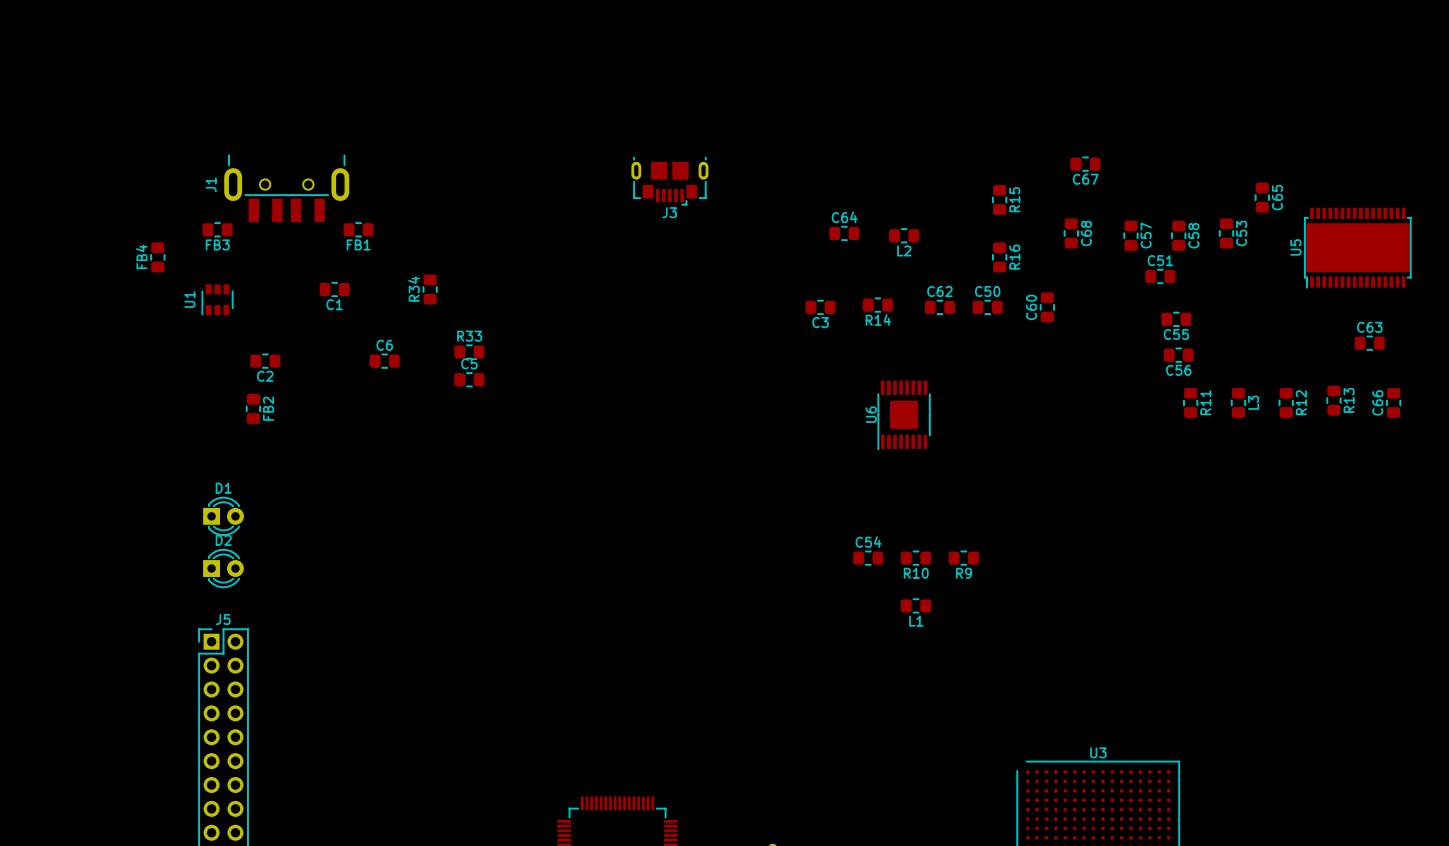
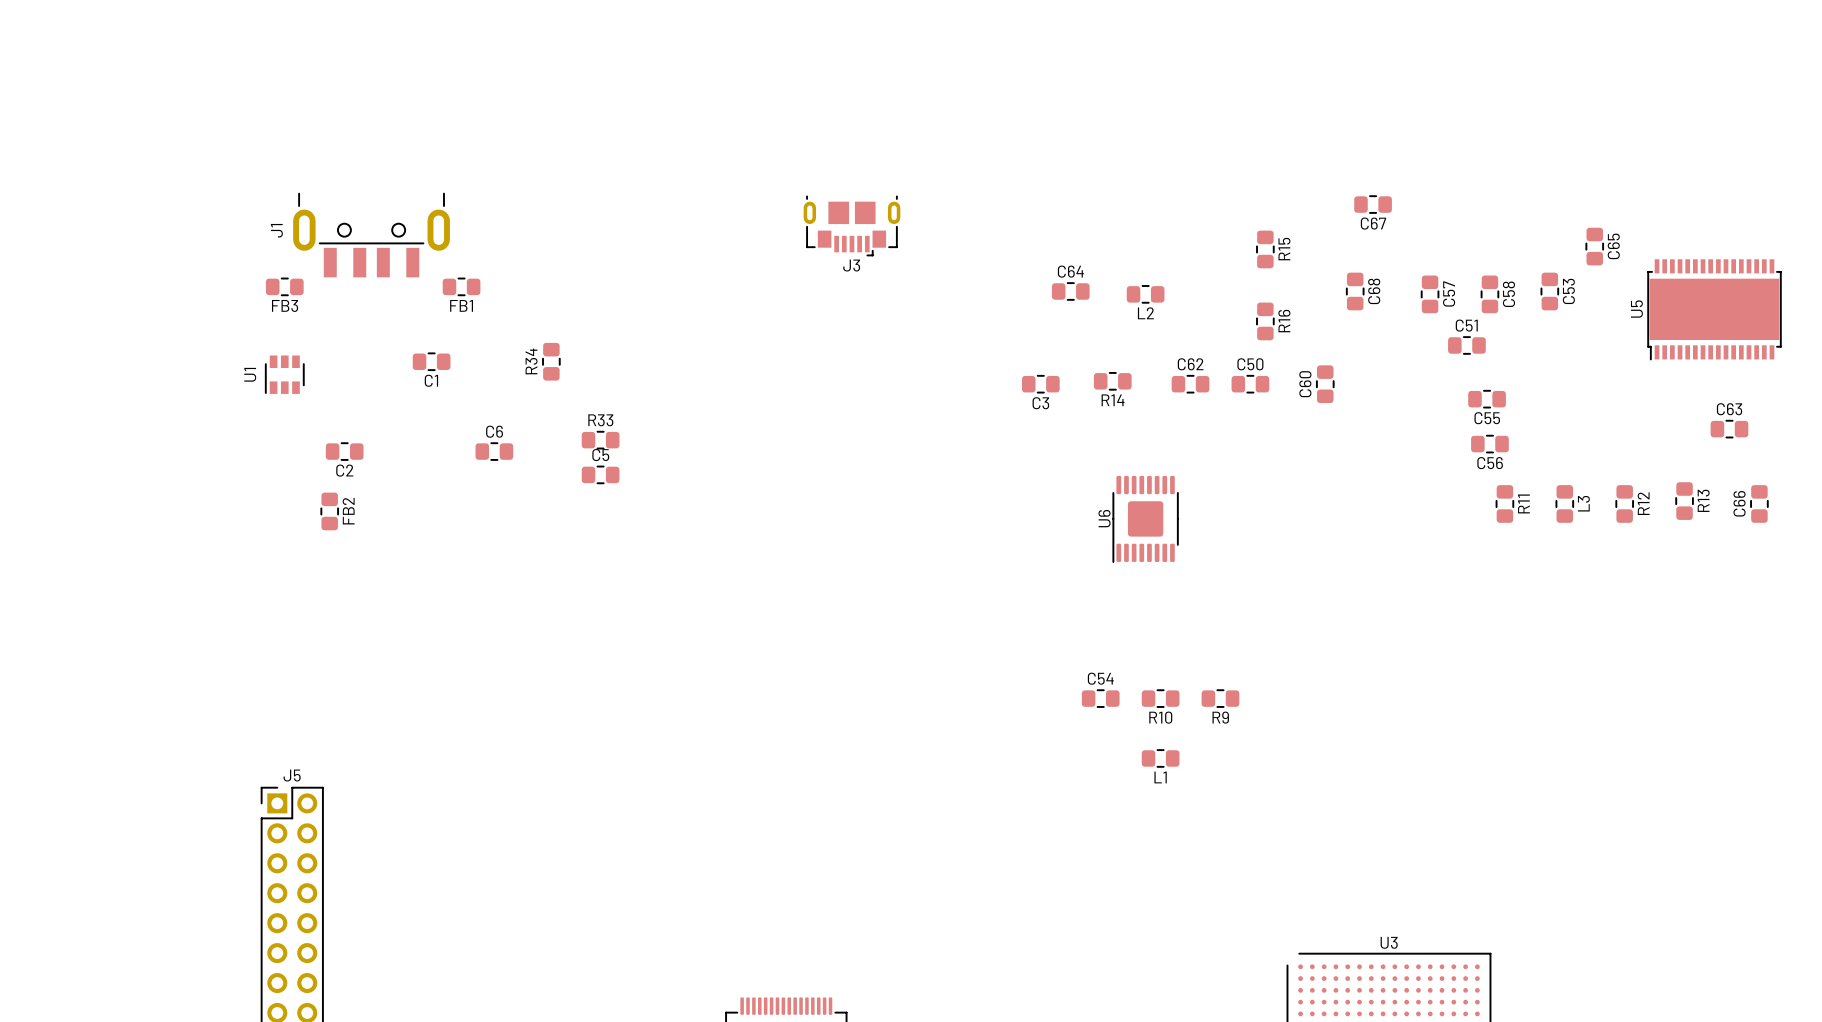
FB4: (157, 257) -> none
D1: (223, 516) -> none
D2: (223, 568) -> none

